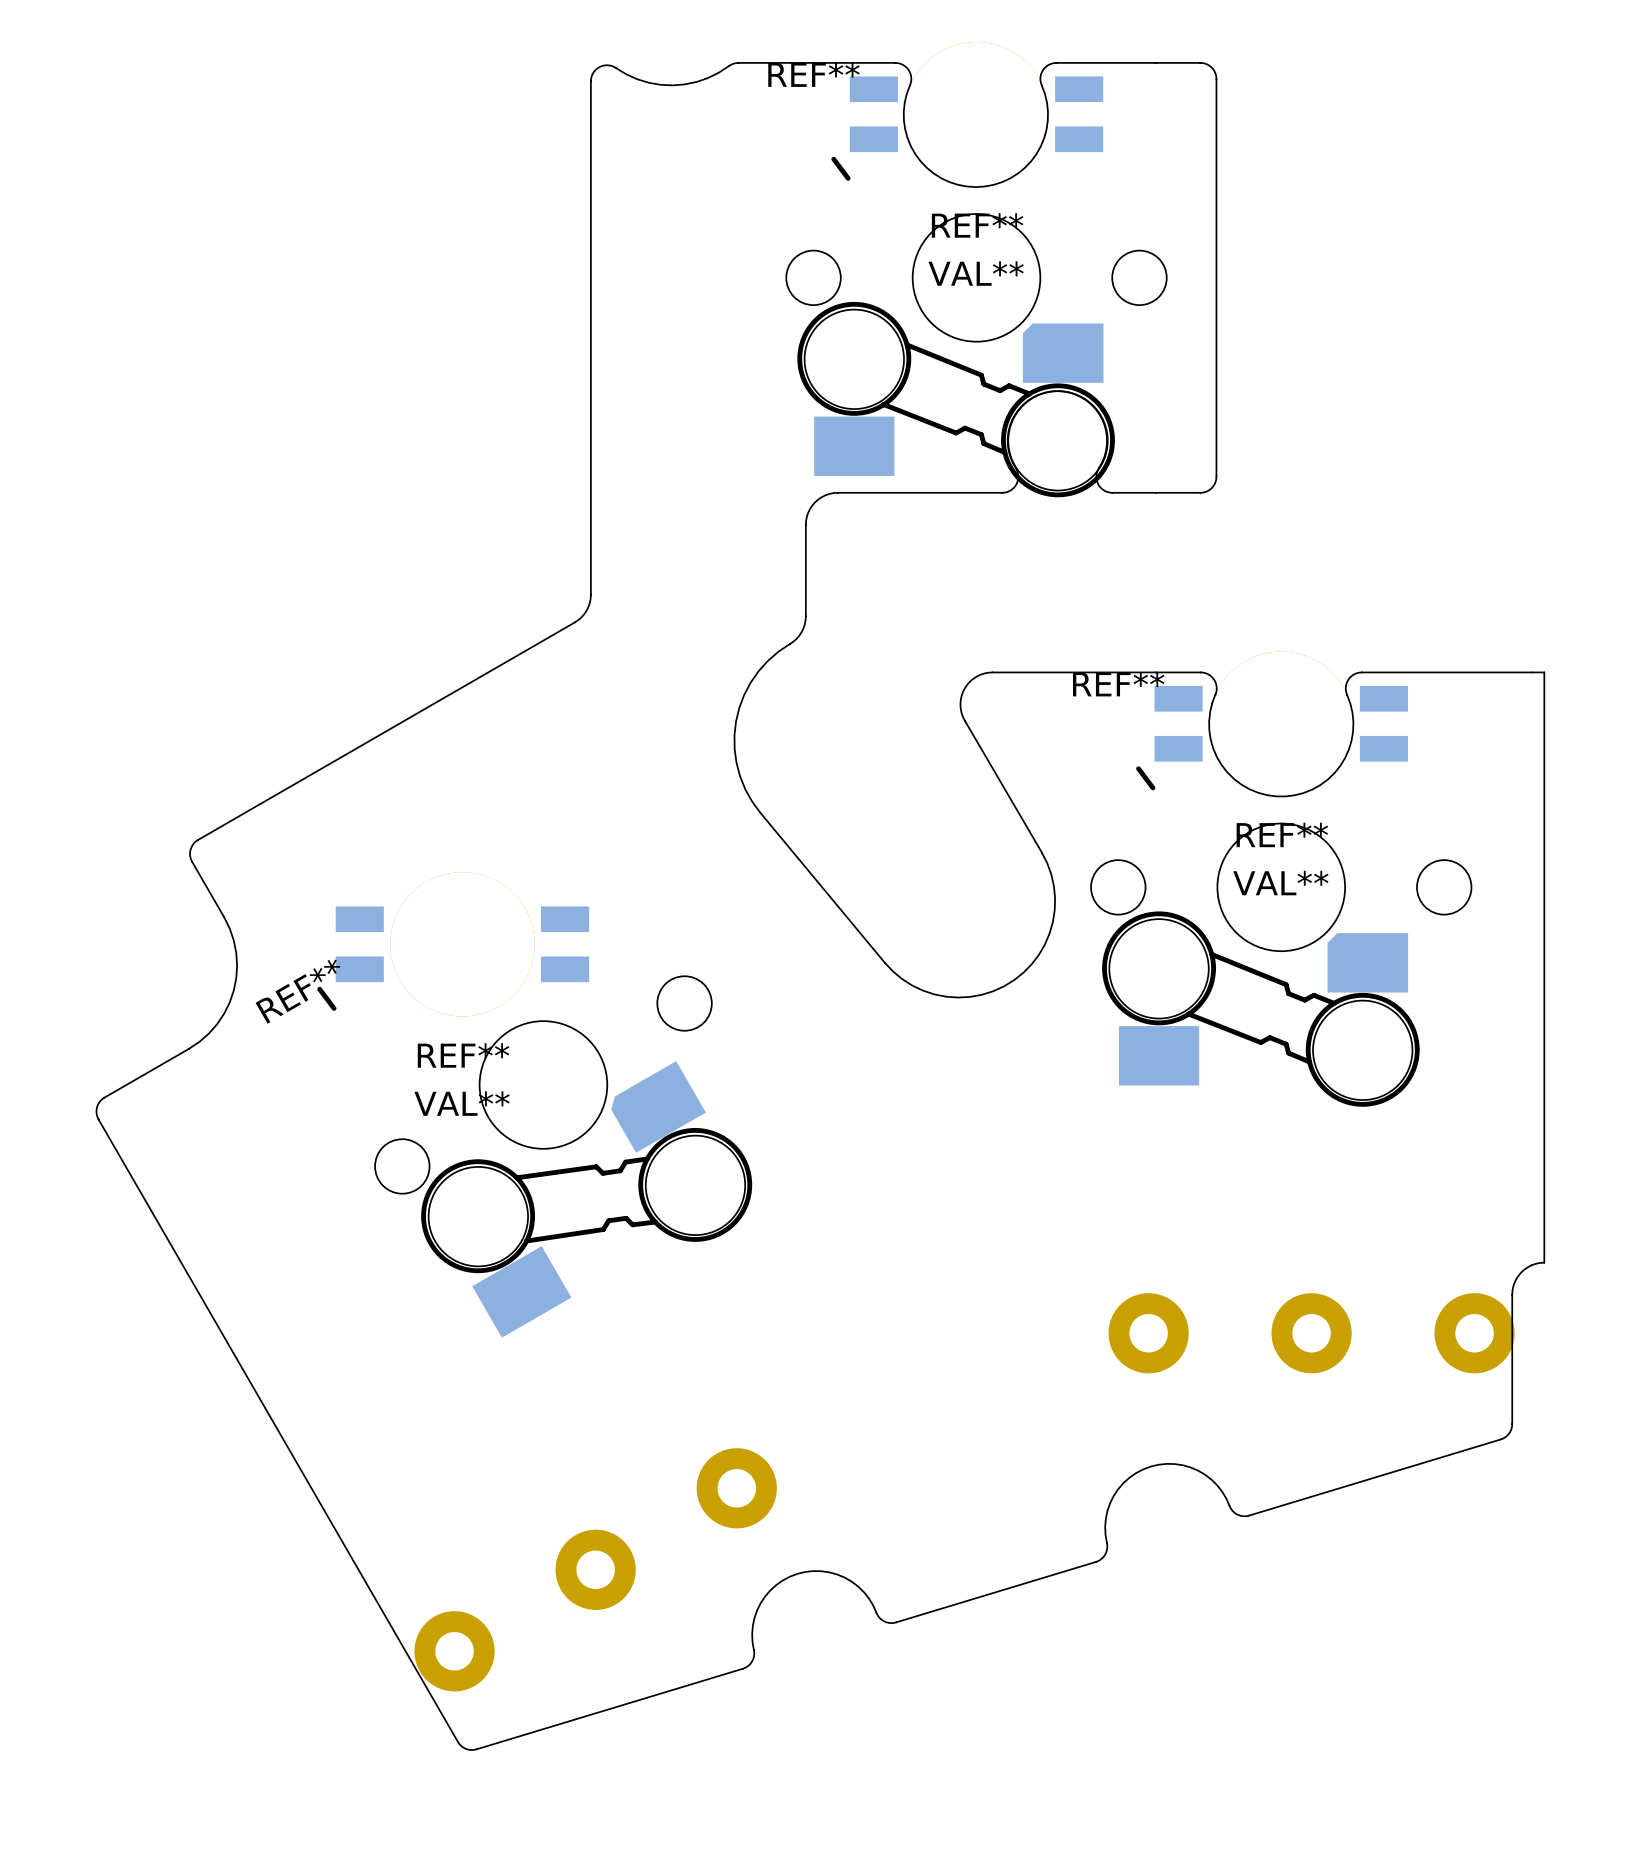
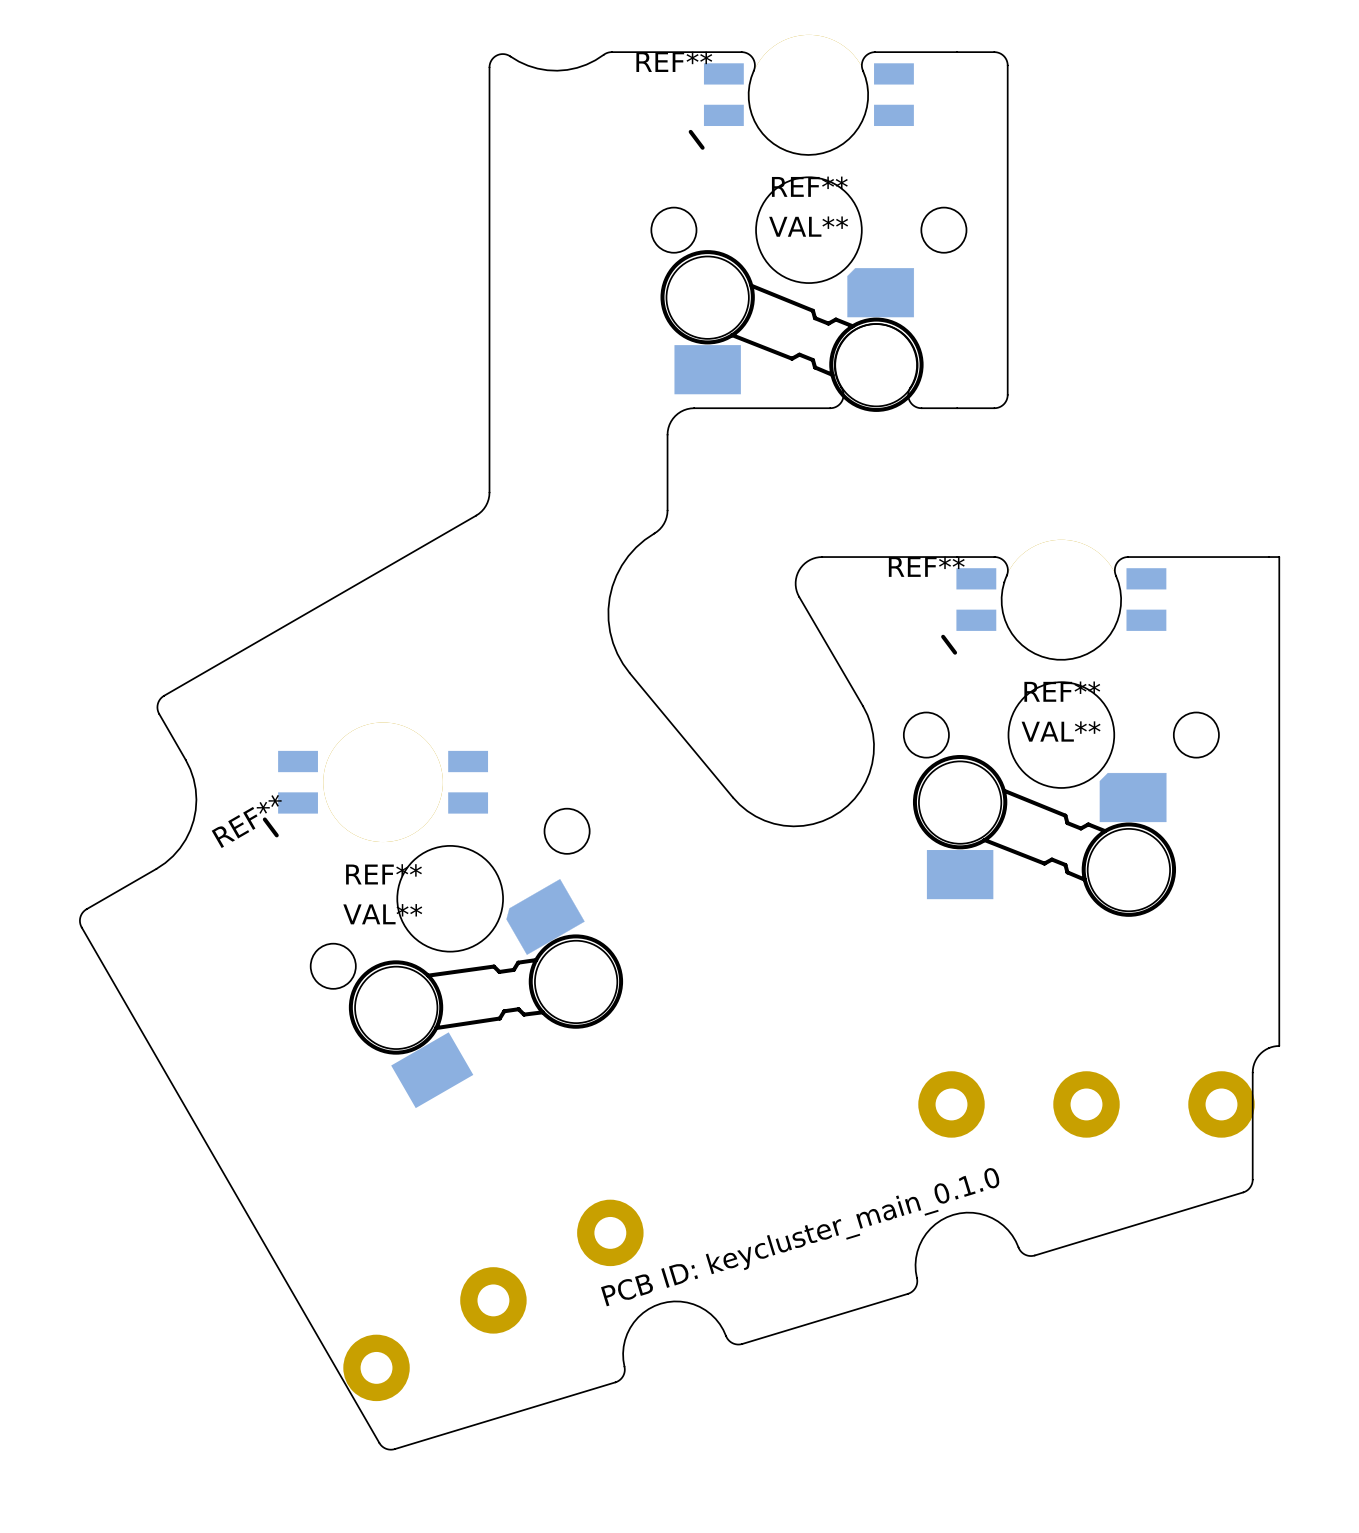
text: none -> PCB ID: keycluster_main_0.1.0 (800, 1236)

